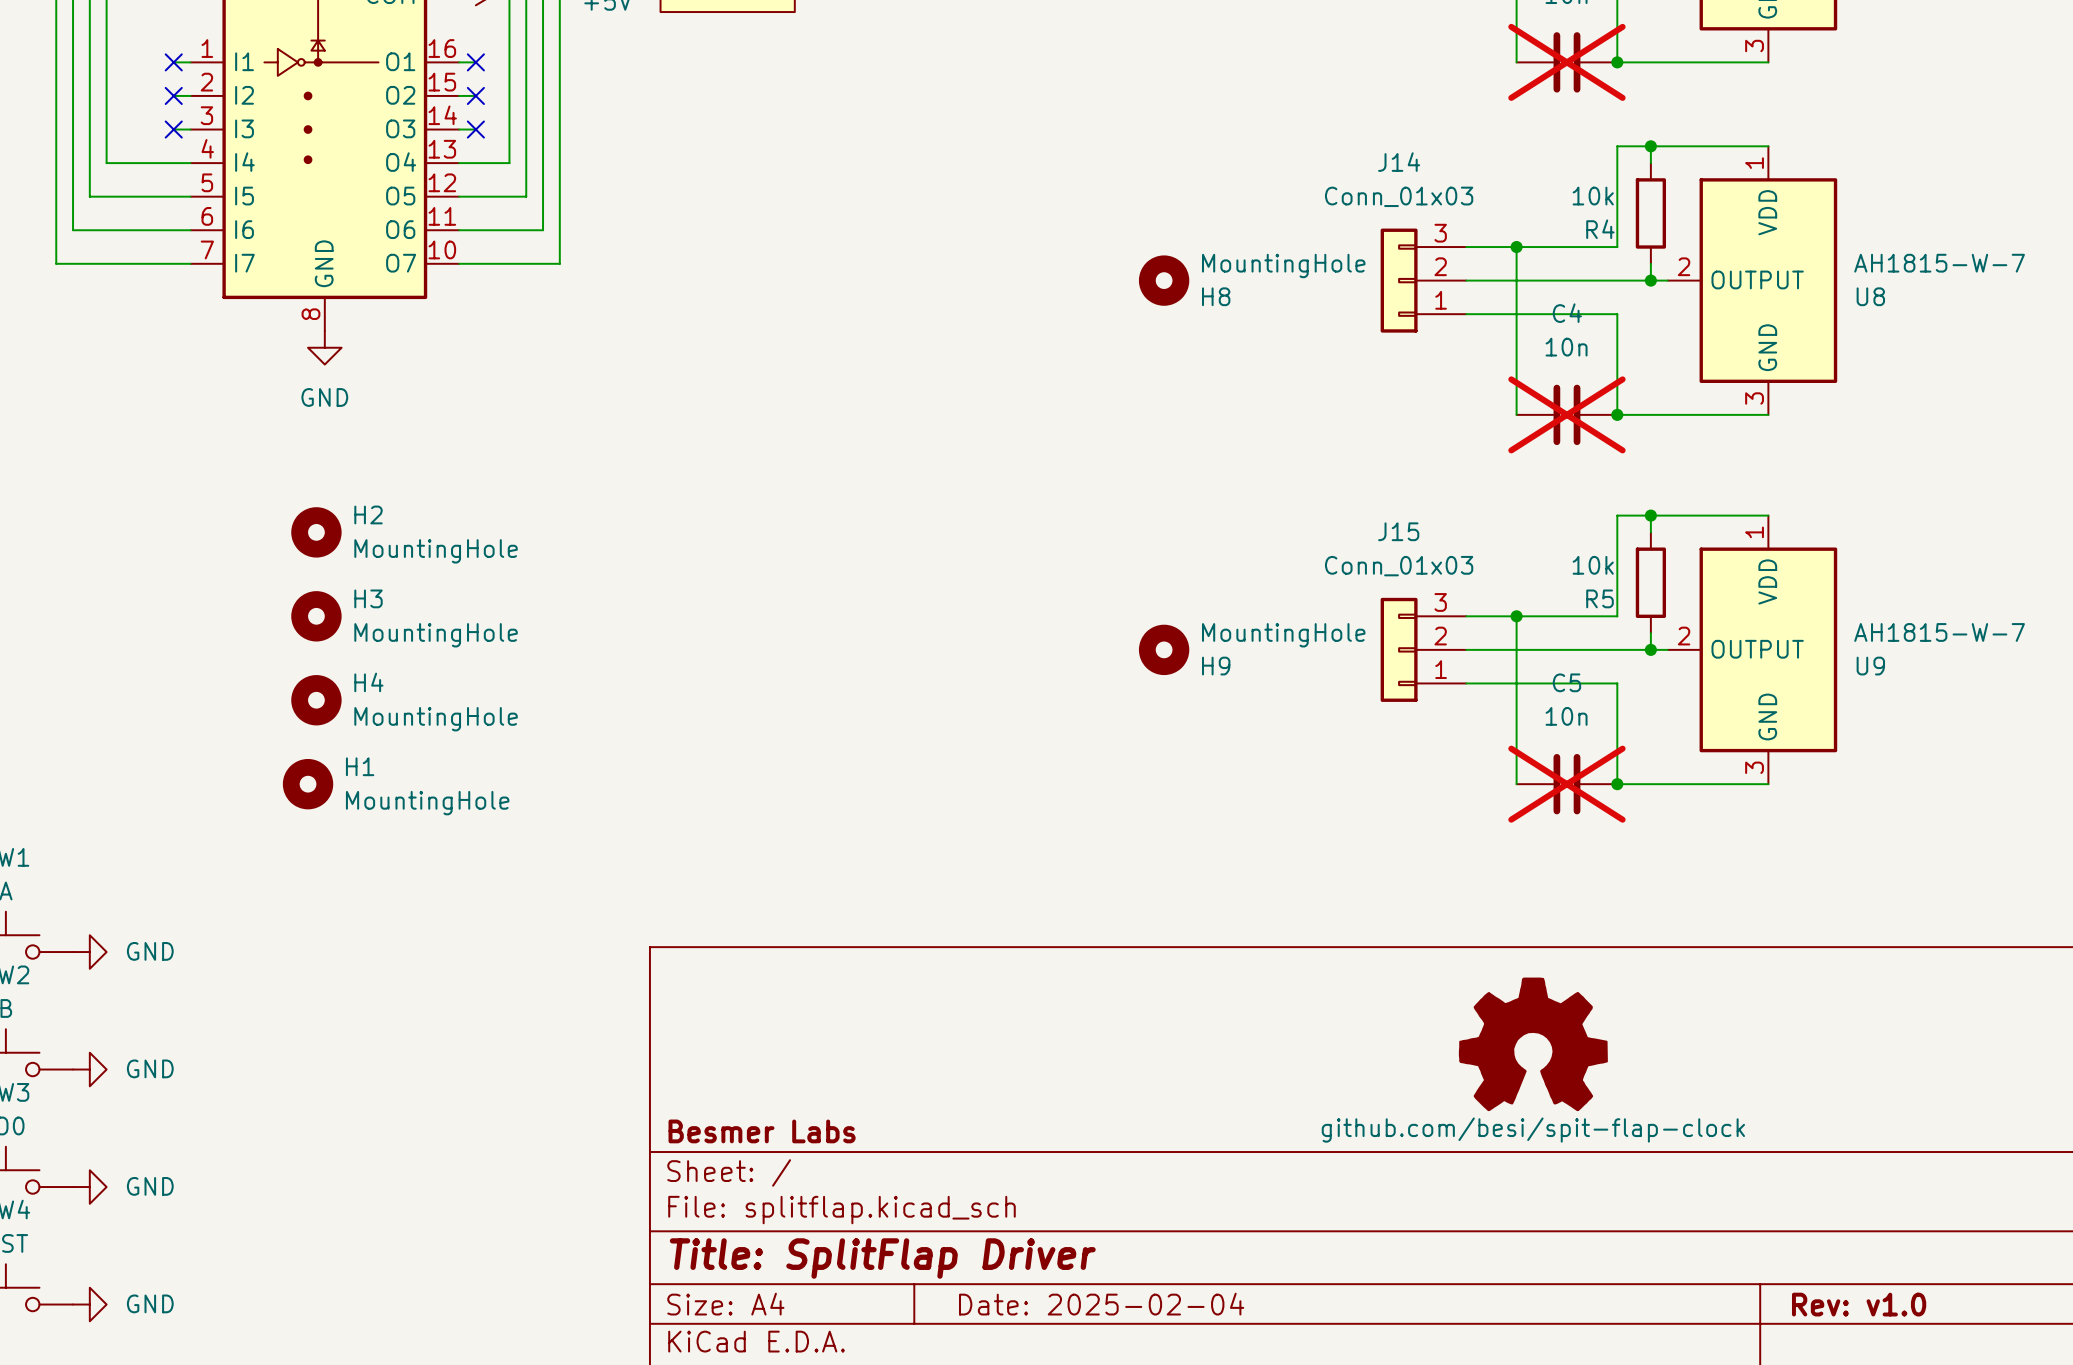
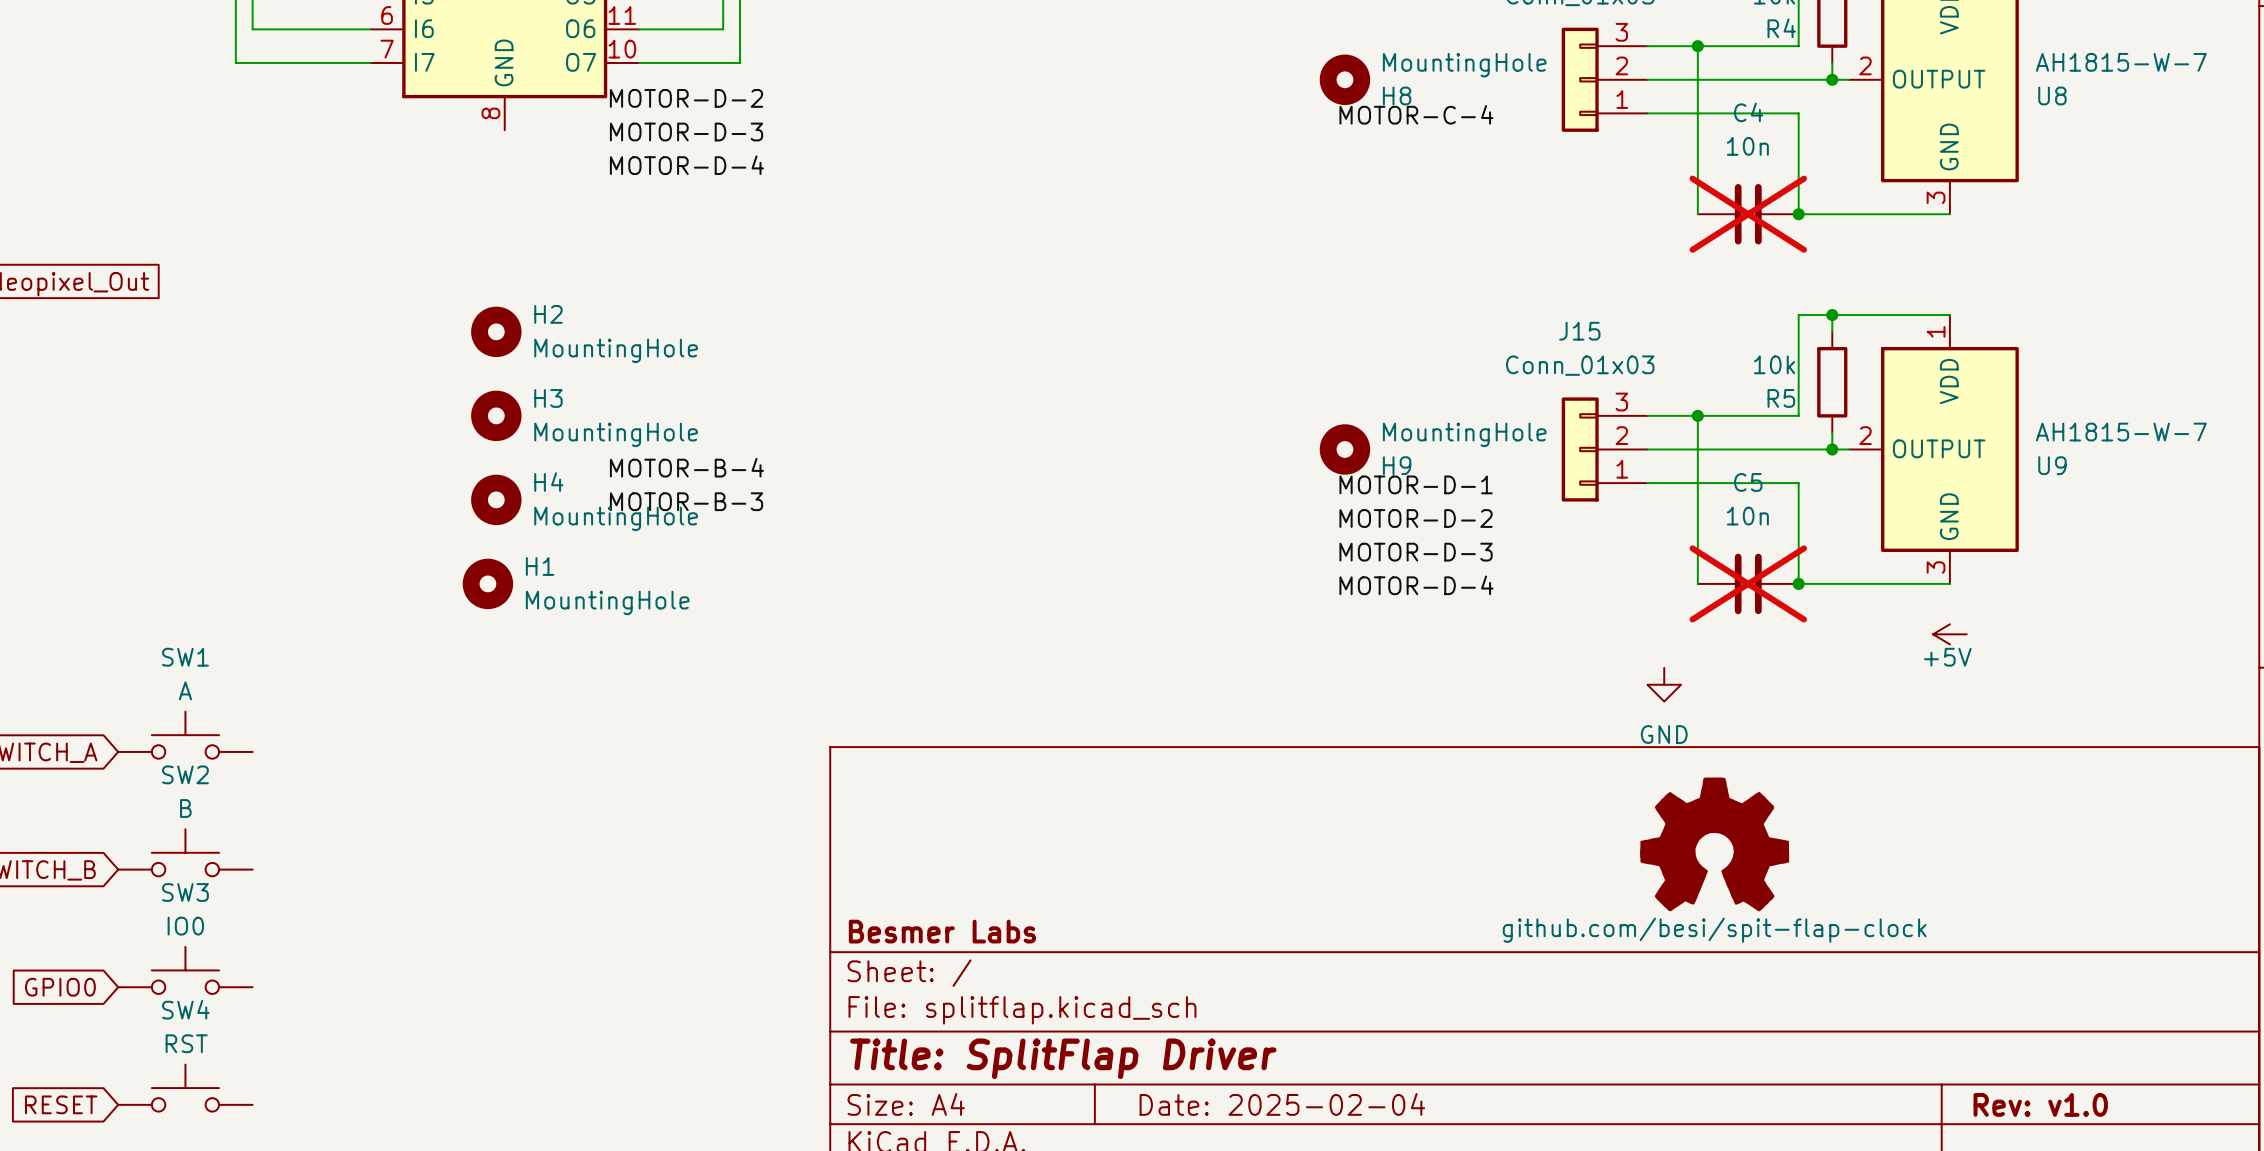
label: none -> MOTOR-D-2 (686, 98)
label: none -> MOTOR-C-4 (1416, 114)
label: none -> MOTOR-D-3 (686, 132)
power symbol: GND (324, 347) -> none
label: none -> MOTOR-D-4 (686, 165)
label: none -> MOTOR-B-4 (686, 467)
label: none -> MOTOR-D-1 (1416, 484)
label: none -> MOTOR-B-3 (686, 501)
label: none -> MOTOR-D-2 (1416, 518)
label: none -> MOTOR-D-3 (1416, 552)
label: none -> MOTOR-D-4 (1416, 585)
power symbol: none -> +5V (1949, 634)
power symbol: none -> GND (1664, 684)
power symbol: GND (89, 952) -> none
power symbol: GND (89, 1069) -> none
power symbol: GND (89, 1187) -> none
power symbol: GND (89, 1304) -> none

